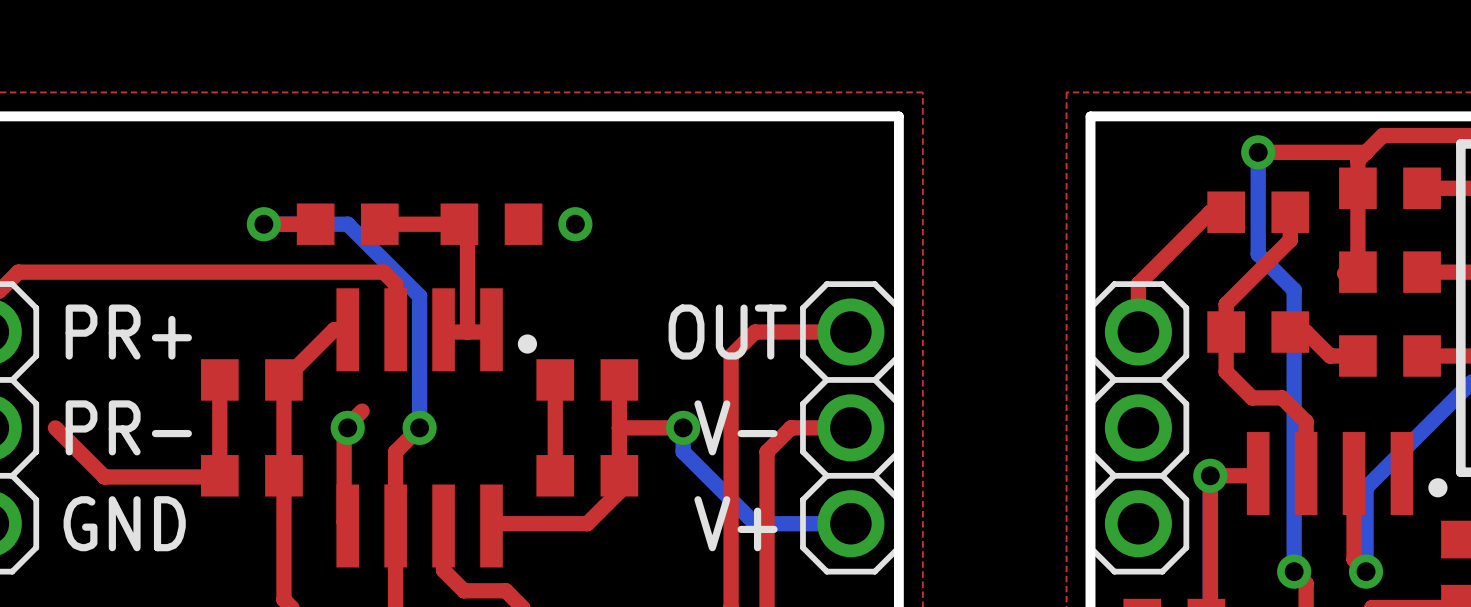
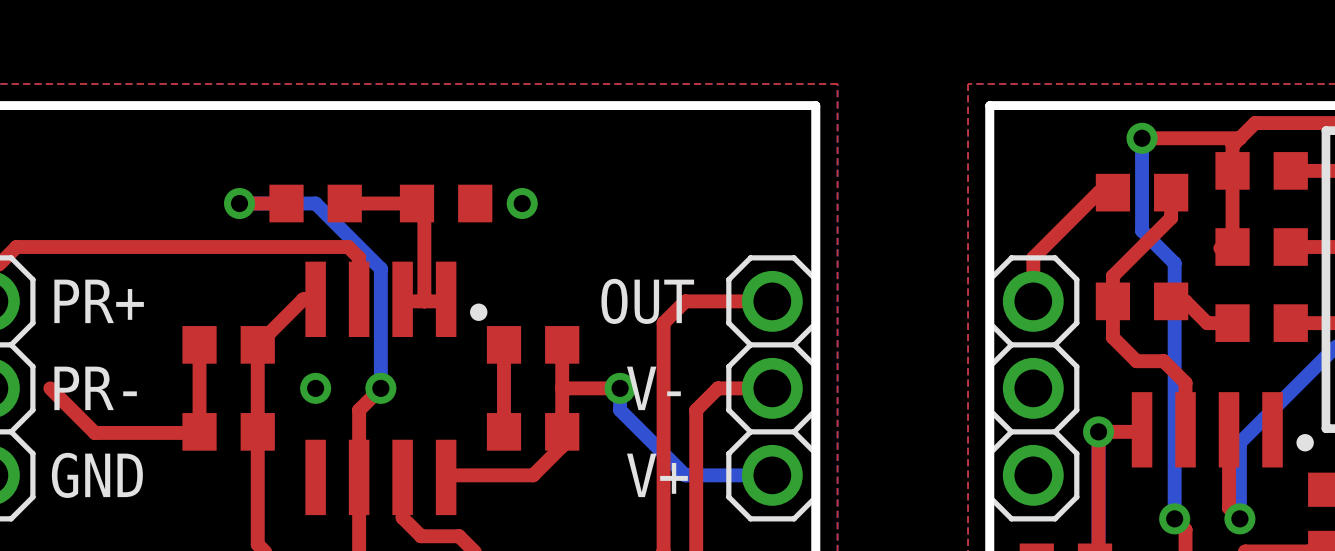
top track: (362, 411) (344, 429) (344, 522) (347, 525) -> none

